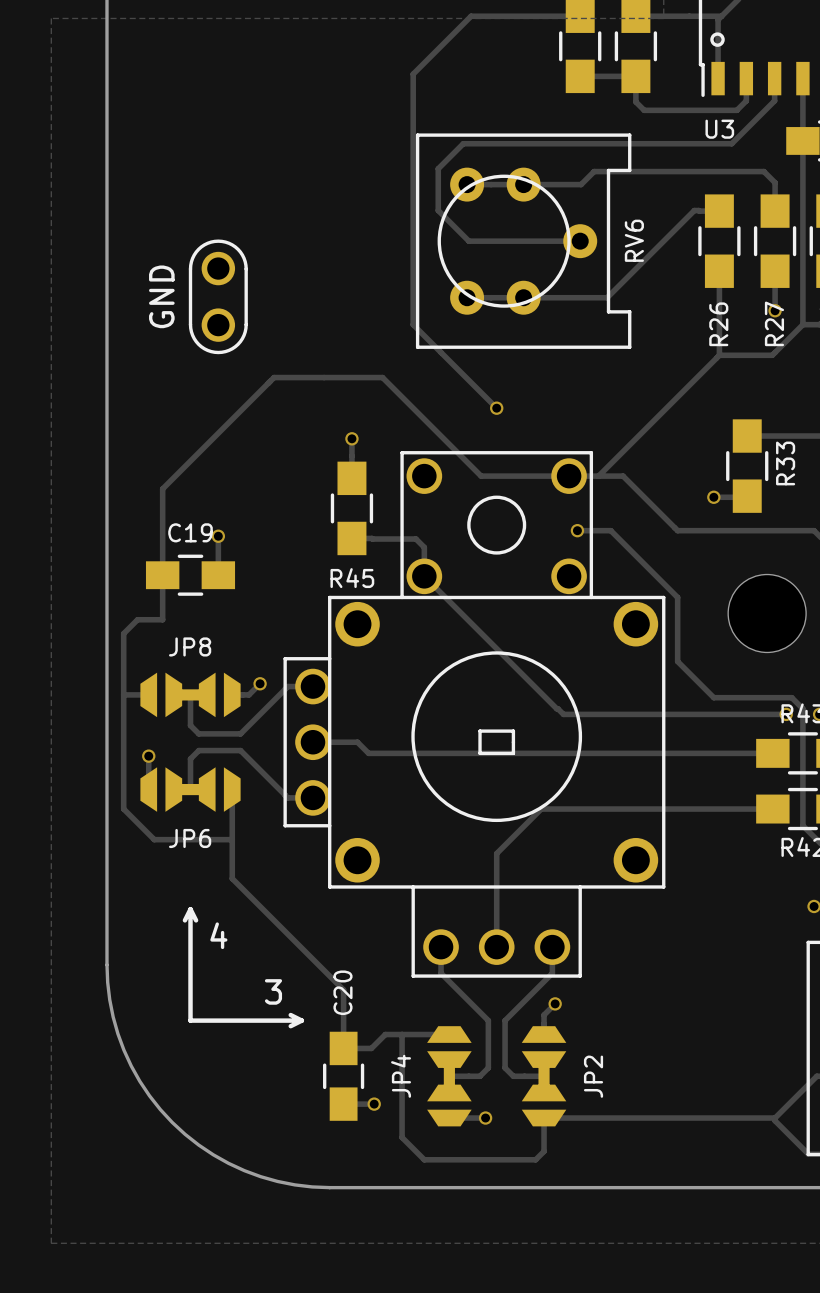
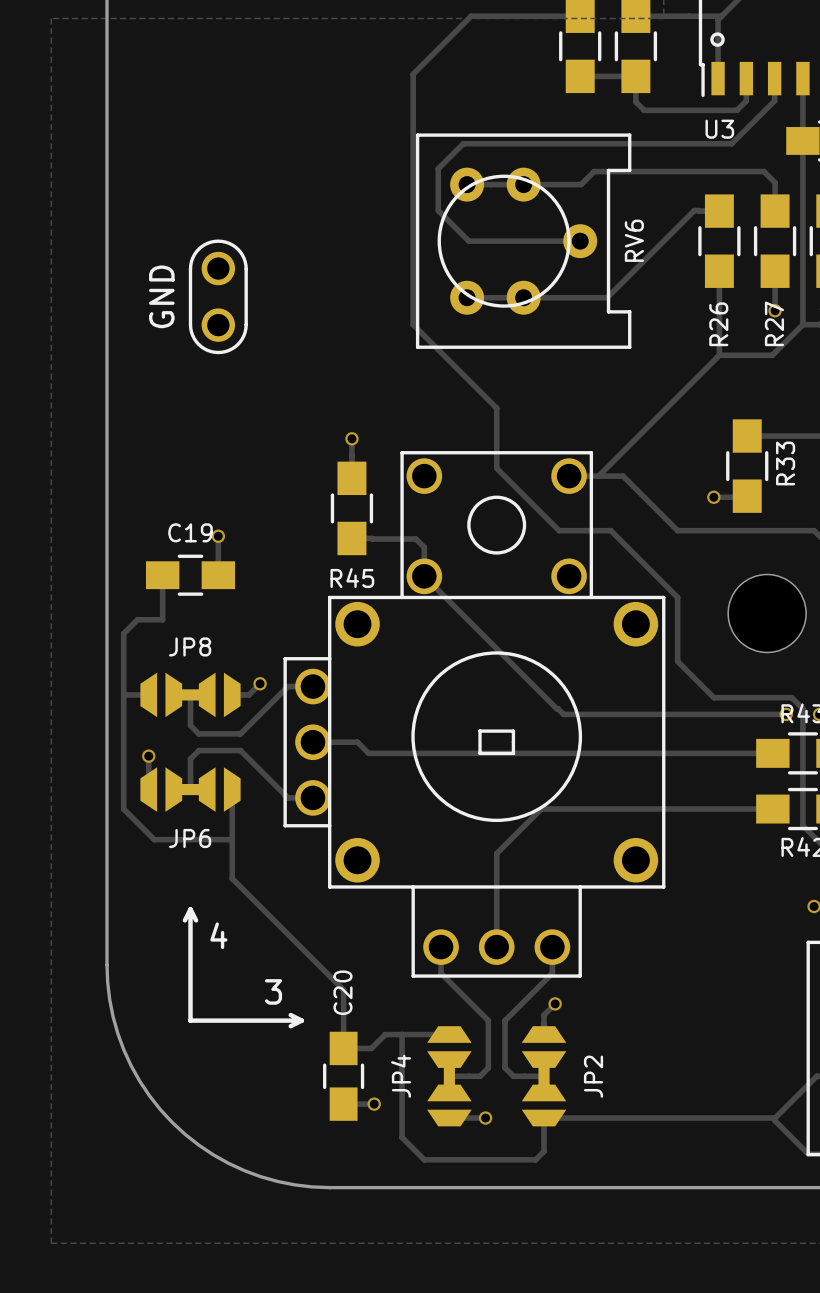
track: none -> (496, 408) (496, 468) (559, 530) (577, 530)
via: (496, 408) -> none
track: (569, 476) (481, 476) (382, 377) (274, 377) (162, 488) (162, 575) -> none
via: (577, 530) -> none

